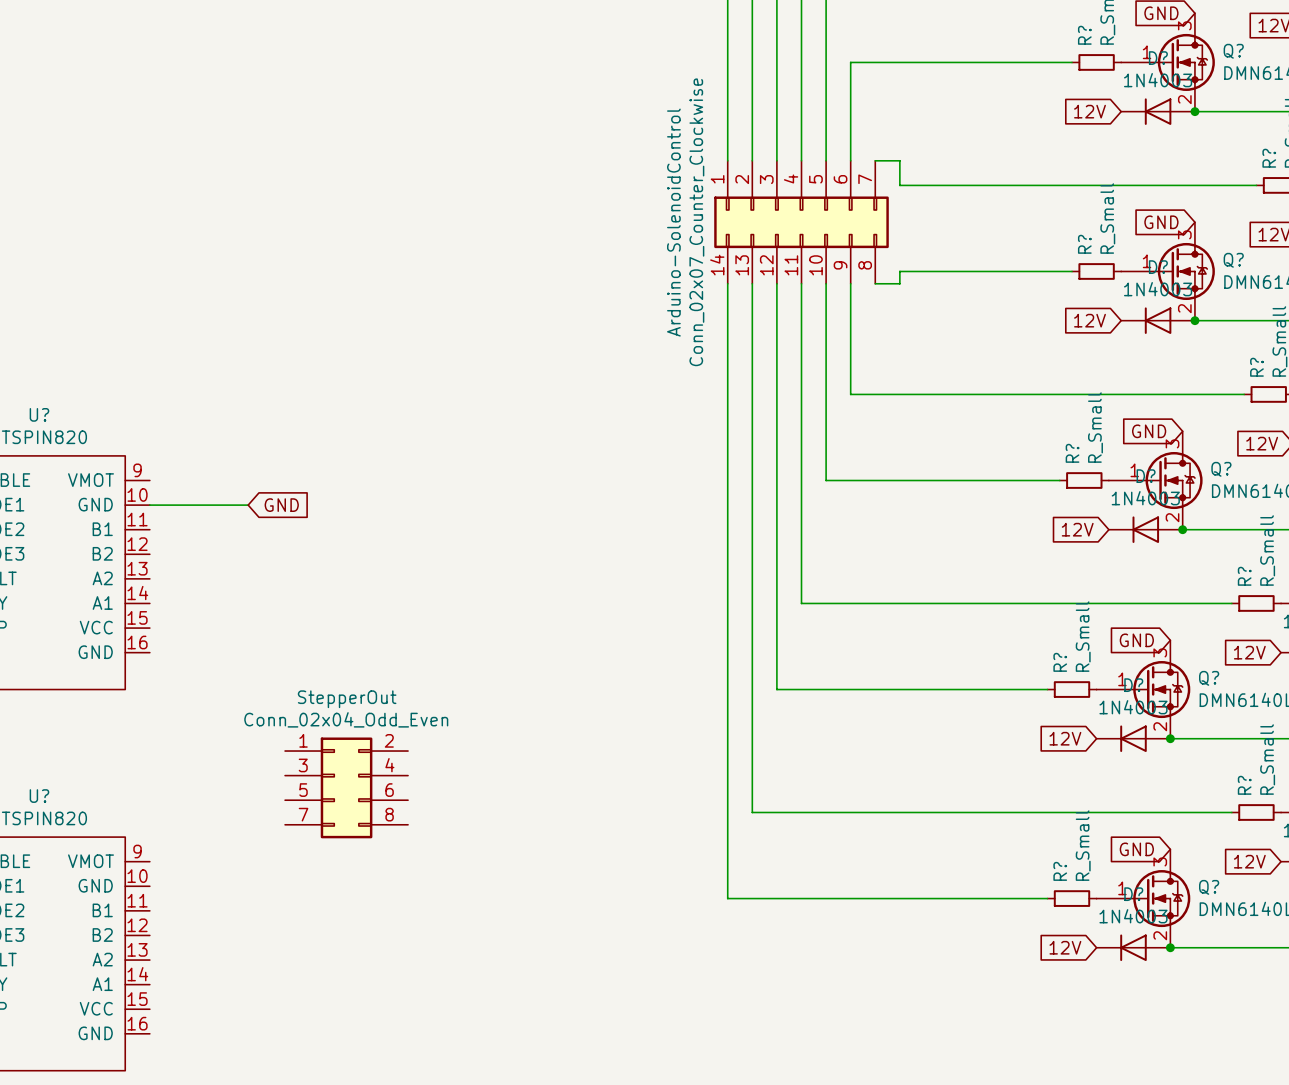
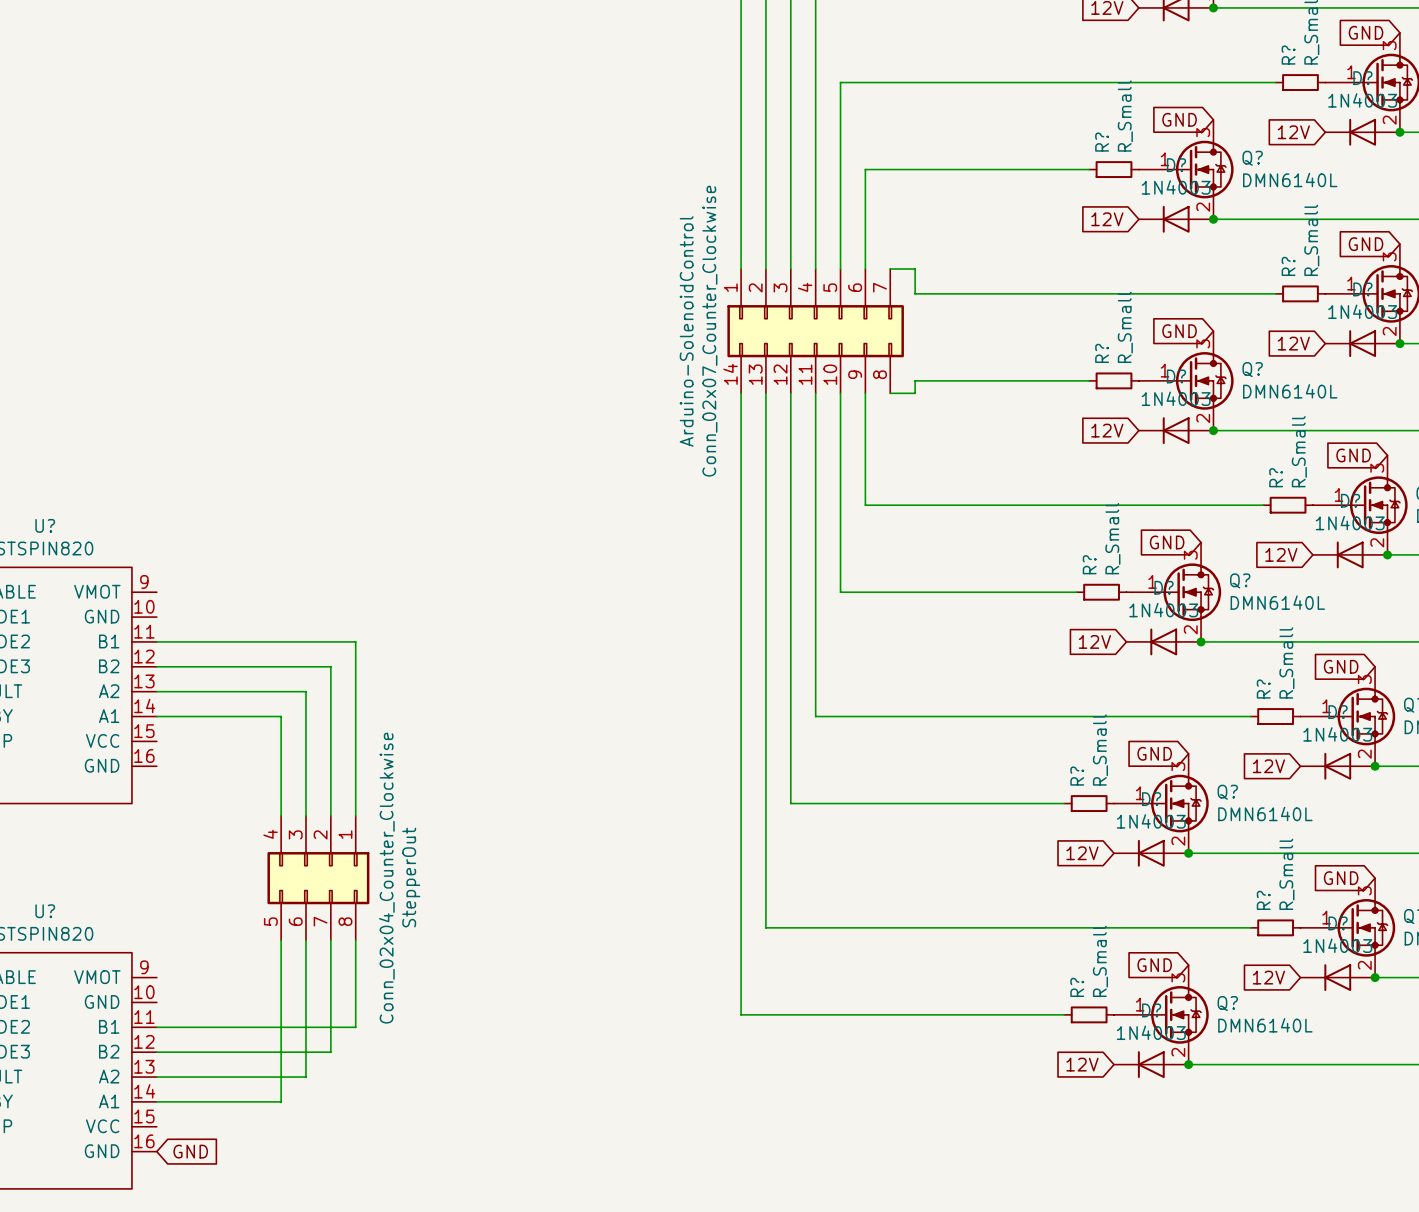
wire: (149, 505) (248, 505) -> none
global label: GND (281, 505) -> none
wire: none -> (156, 641) (355, 641) (355, 815)
wire: none -> (156, 666) (330, 666) (330, 815)
wire: none -> (156, 691) (305, 691) (305, 815)
wire: none -> (156, 716) (281, 716) (281, 815)
StepperOut: none -> Conn_02x04_Counter_Clockwise (318, 878)
StepperOut: Conn_02x04_Odd_Even (346, 787) -> none
wire: none -> (281, 940) (281, 1101) (156, 1101)
wire: none -> (305, 940) (305, 1077) (156, 1077)
wire: none -> (330, 940) (330, 1052) (156, 1052)
wire: none -> (355, 940) (355, 1027) (156, 1027)
global label: none -> GND (190, 1151)

